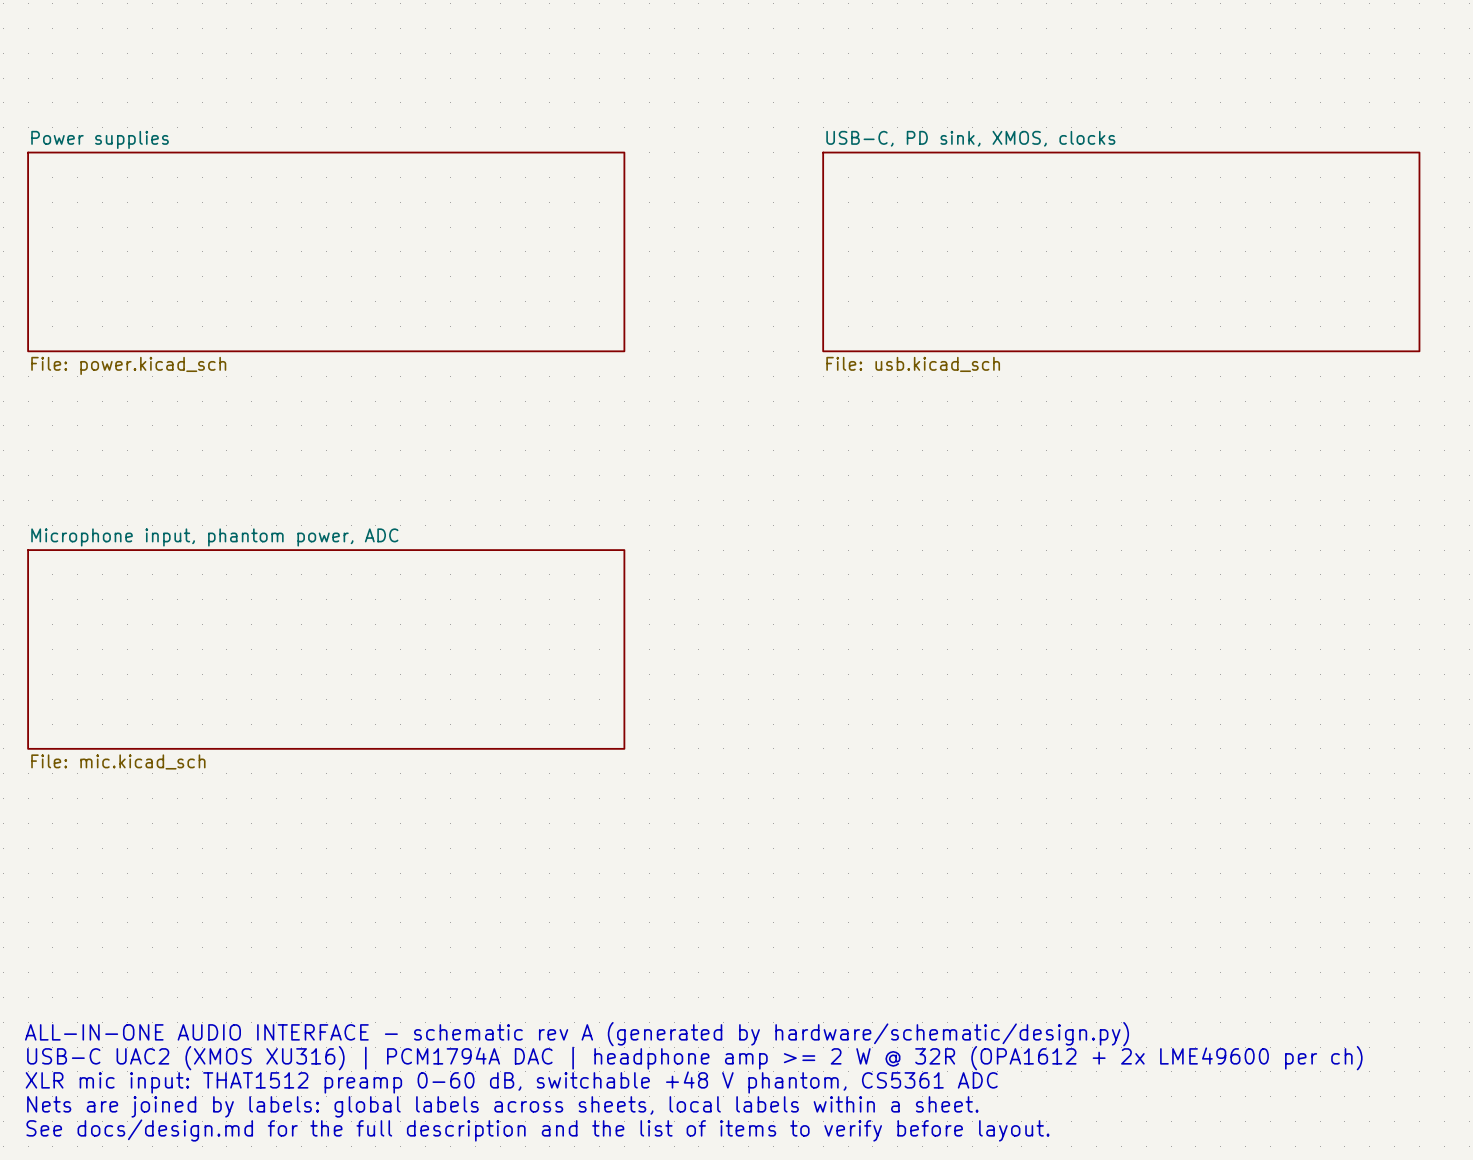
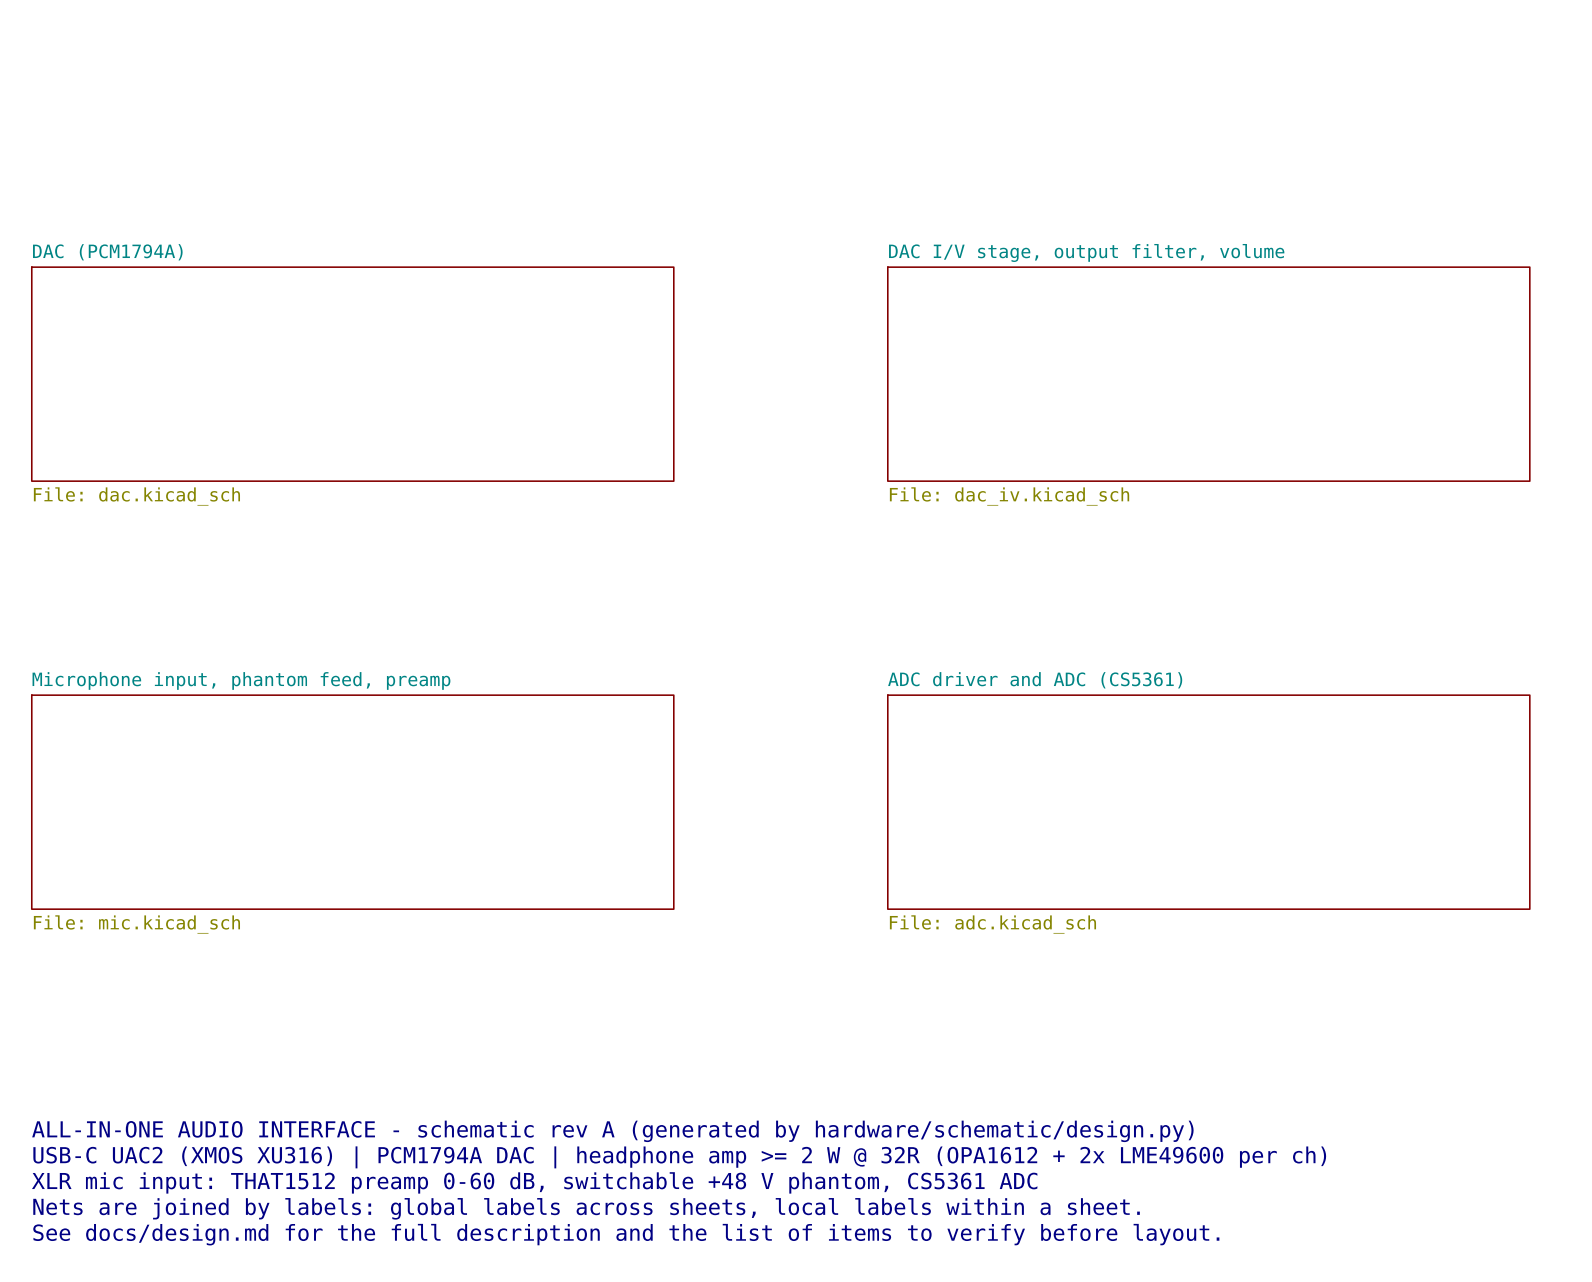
sheet Power supplies: File: power.kicad_sch (326, 251) -> none
sheet USB-C, PD sink, XMOS, clocks: File: usb.kicad_sch (1121, 251) -> none
sheet DAC (PCM1794A): none -> File: dac.kicad_sch (352, 374)
sheet DAC I/V stage, output filter, volume: none -> File: dac_iv.kicad_sch (1208, 374)
sheet Microphone input, phantom power, ADC: File: mic.kicad_sch (326, 649) -> none
sheet Microphone input, phantom feed, preamp: none -> File: mic.kicad_sch (352, 802)
sheet ADC driver and ADC (CS5361): none -> File: adc.kicad_sch (1208, 802)

